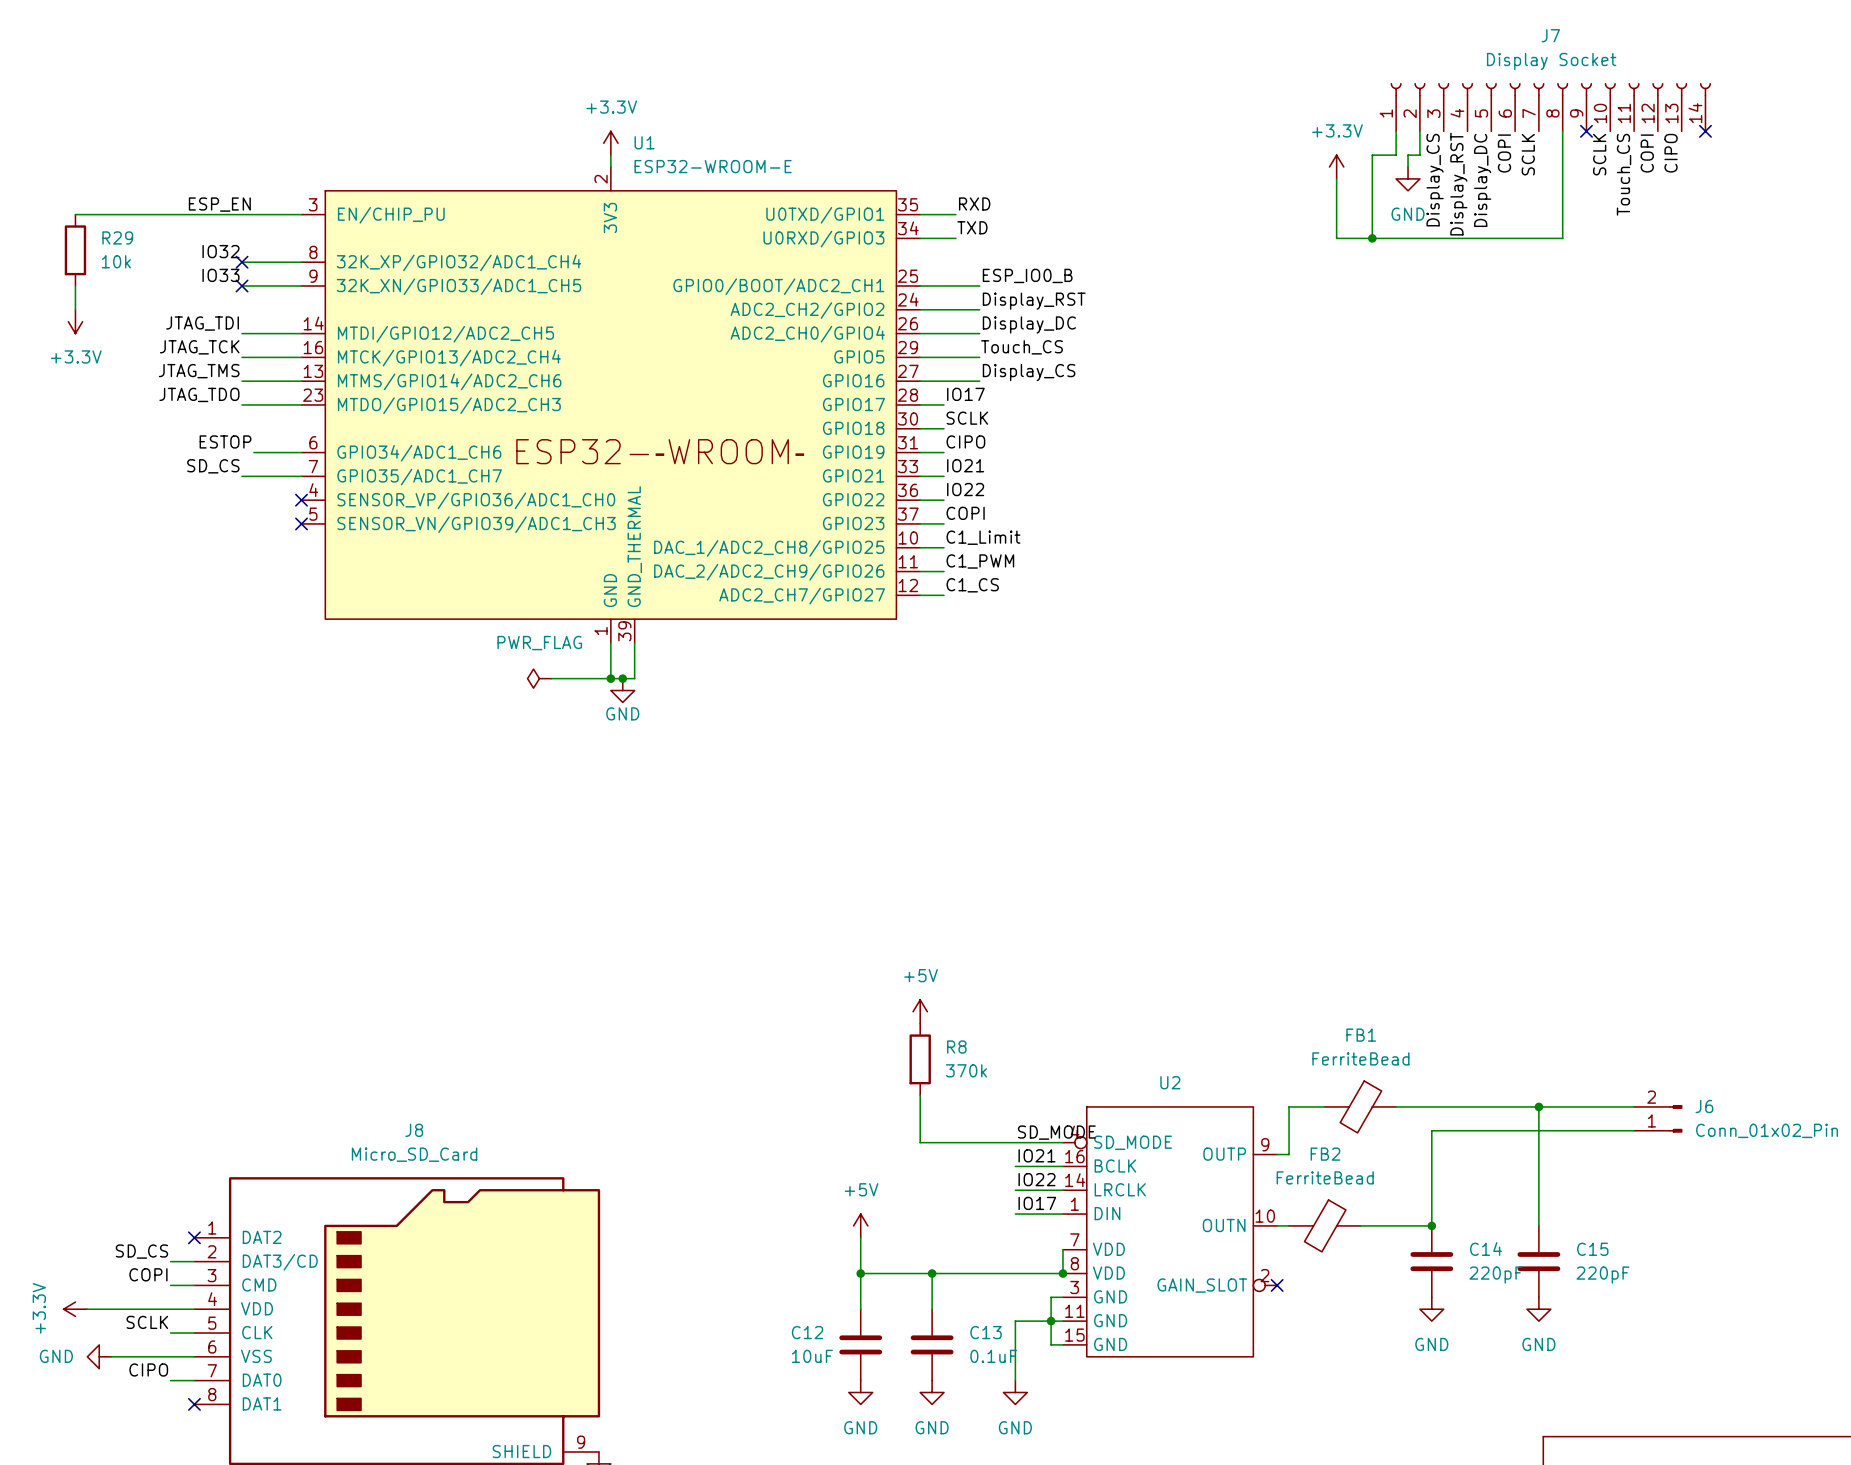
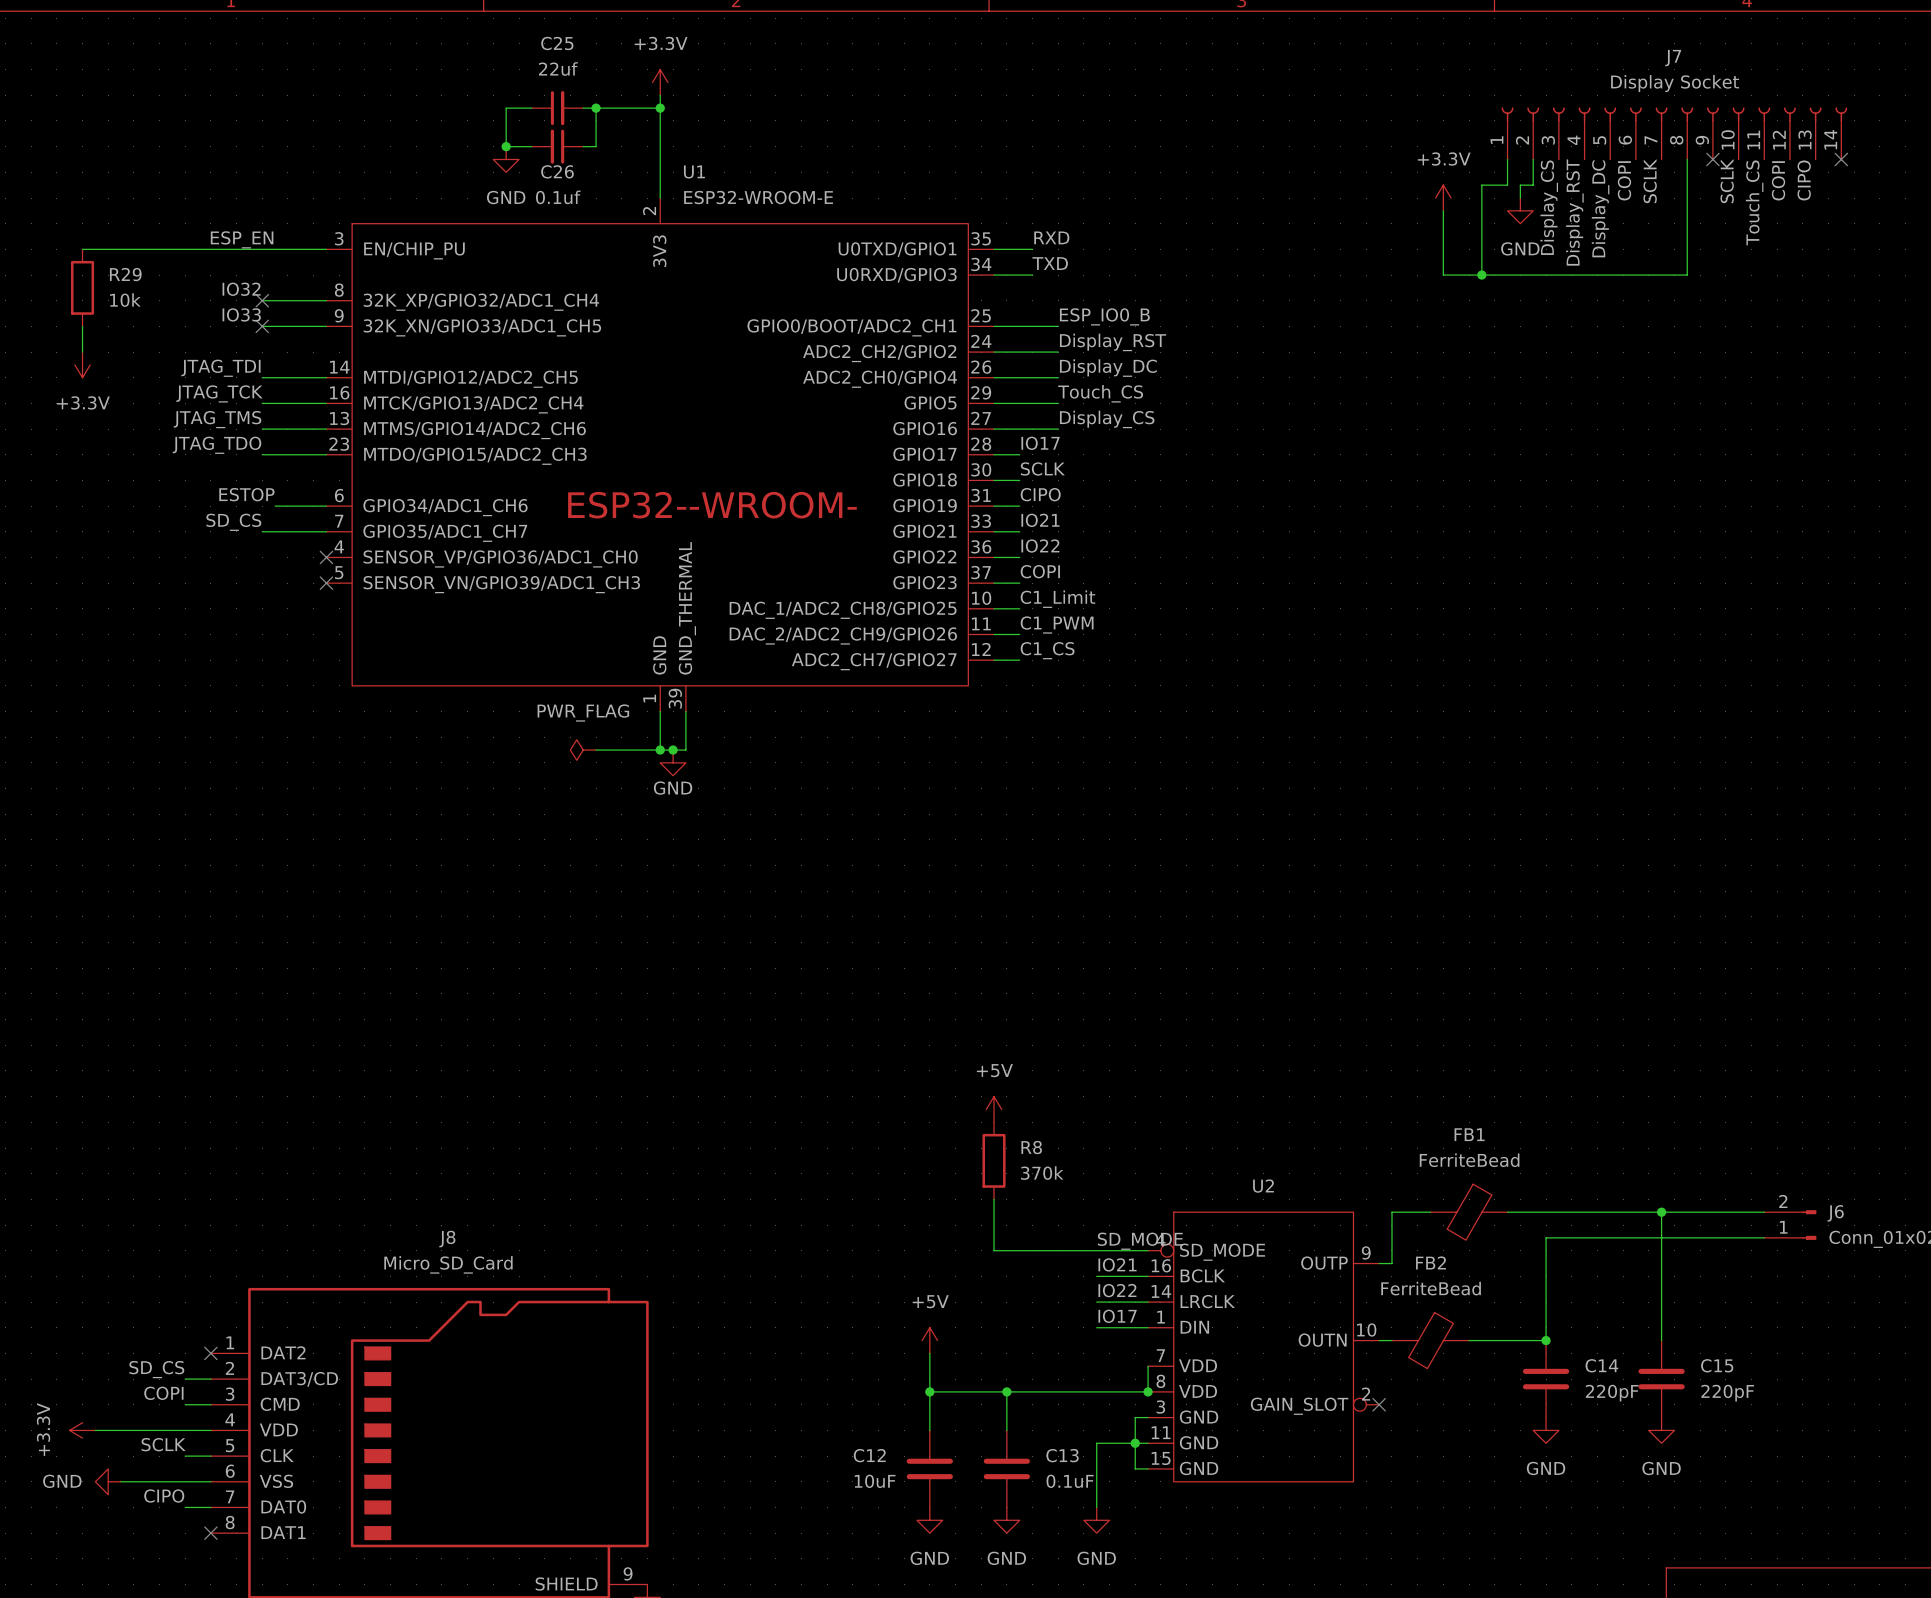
wire: none -> (660, 95) (660, 185)
wire: none -> (531, 108) (506, 108) (506, 146) (531, 146)
C25: none -> 22uf (557, 108)
wire: none -> (583, 108) (660, 108)
wire: none -> (596, 108) (596, 146) (583, 146)
junction: none -> (596, 108)
junction: none -> (660, 108)
junction: none -> (506, 146)
C26: none -> 0.1uf (557, 146)
power symbol: none -> GND (506, 159)
power symbol position: +3.3V (610, 143) -> +3.3V (660, 82)

